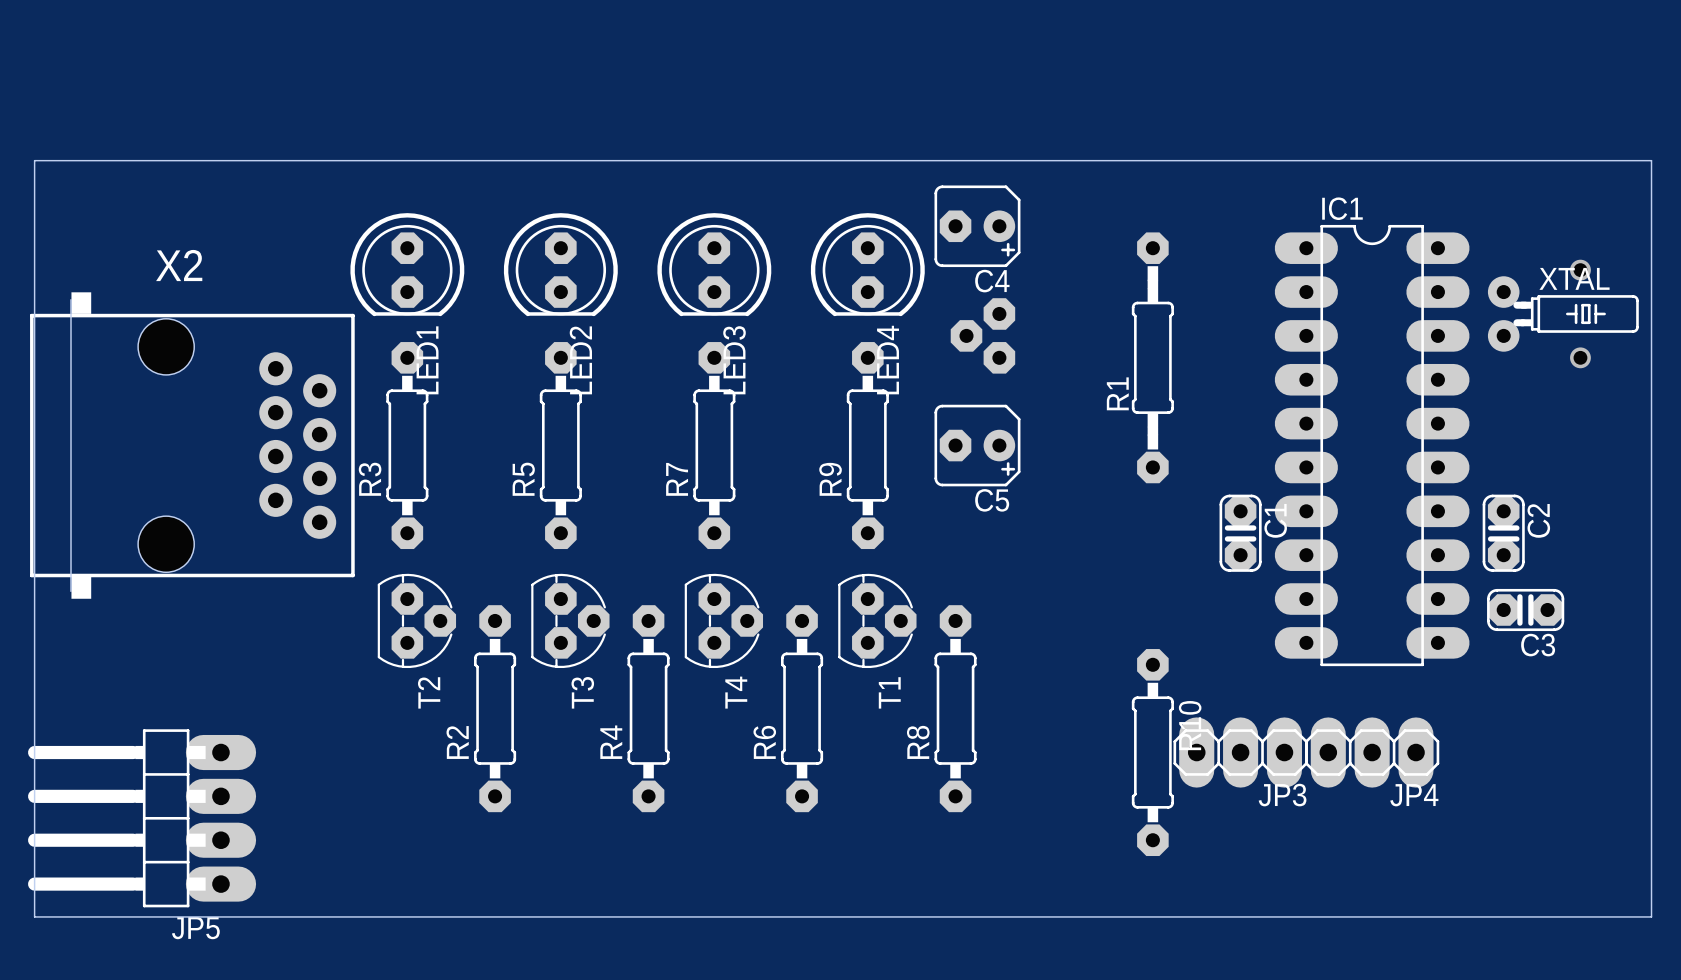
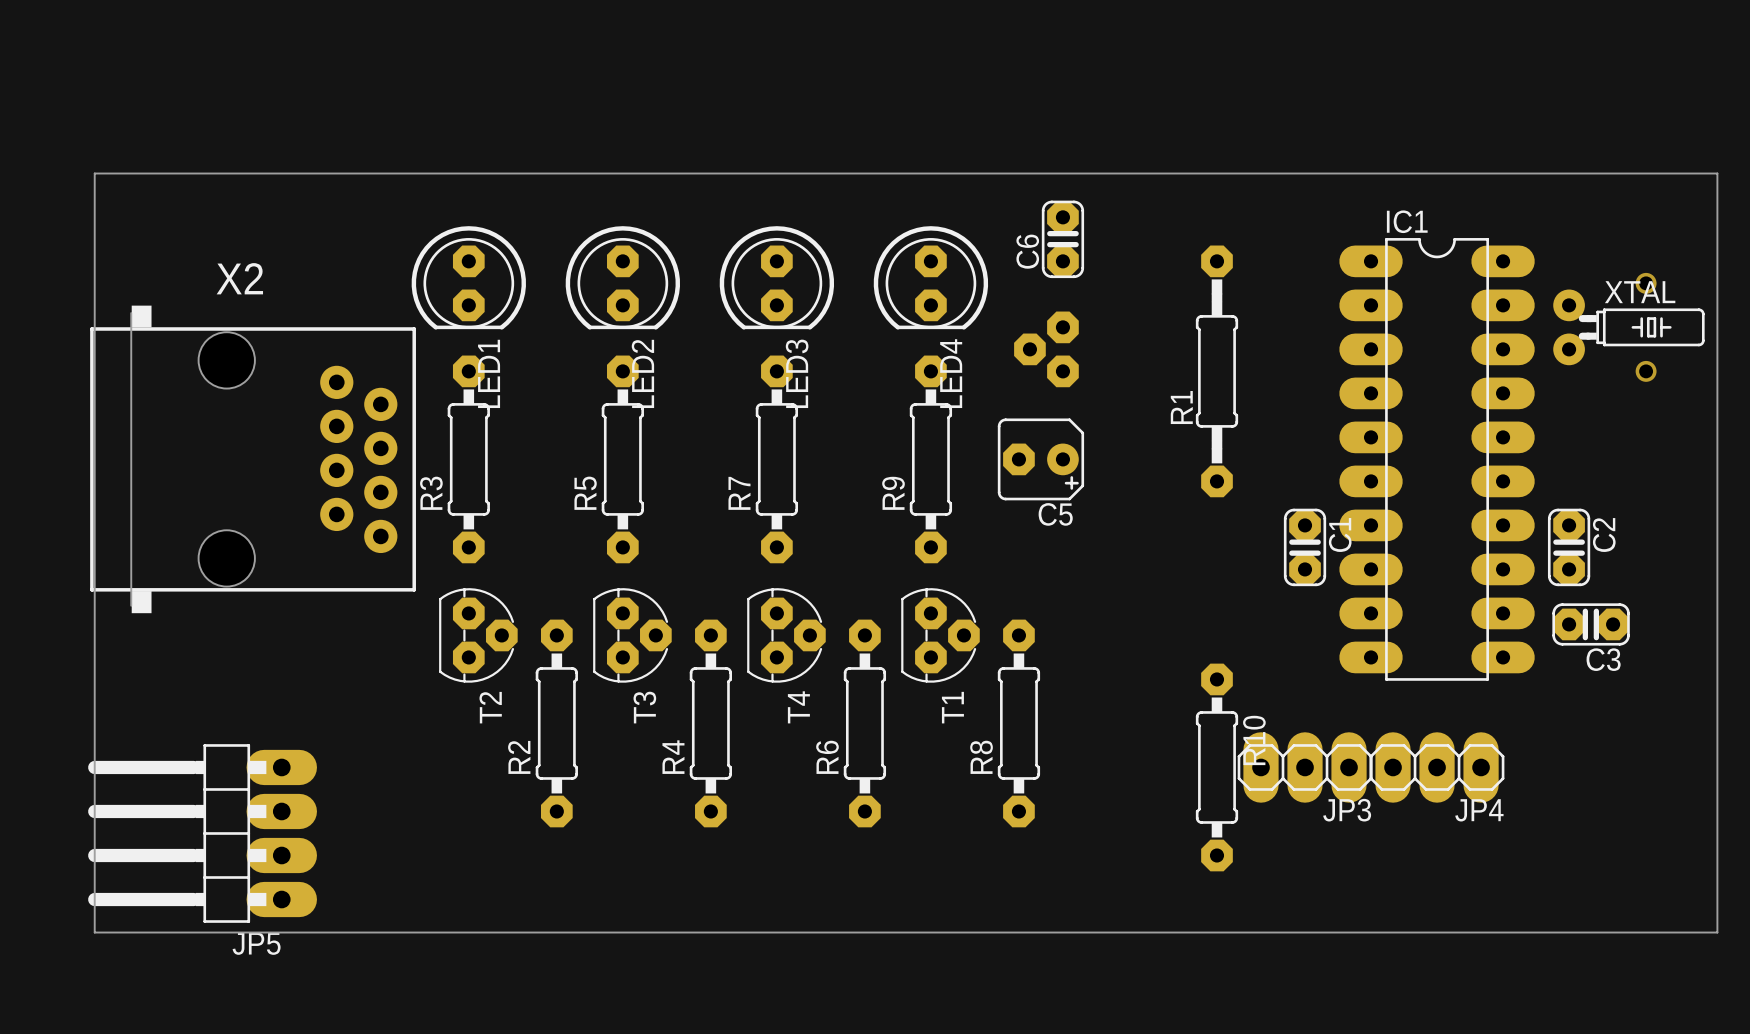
C4: (977, 226) -> none
C6: none -> (1062, 239)

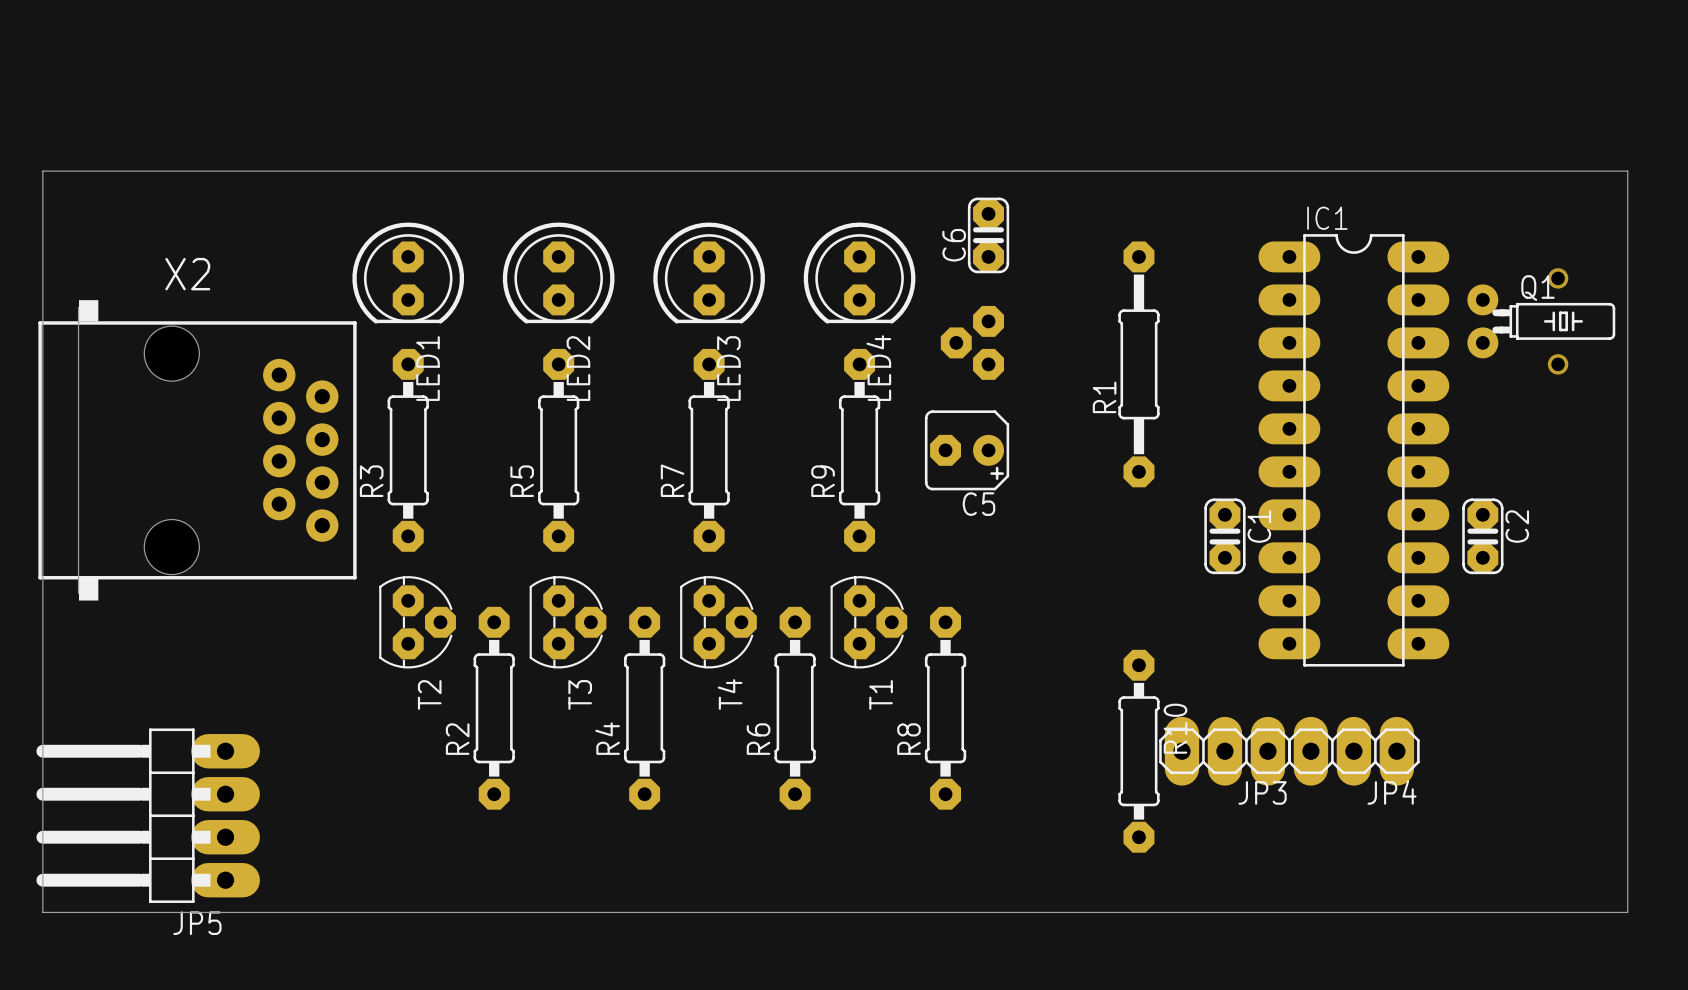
XTAL name: XTAL (1640, 292) -> Q1 (1538, 288)
C3: (1591, 624) -> none

